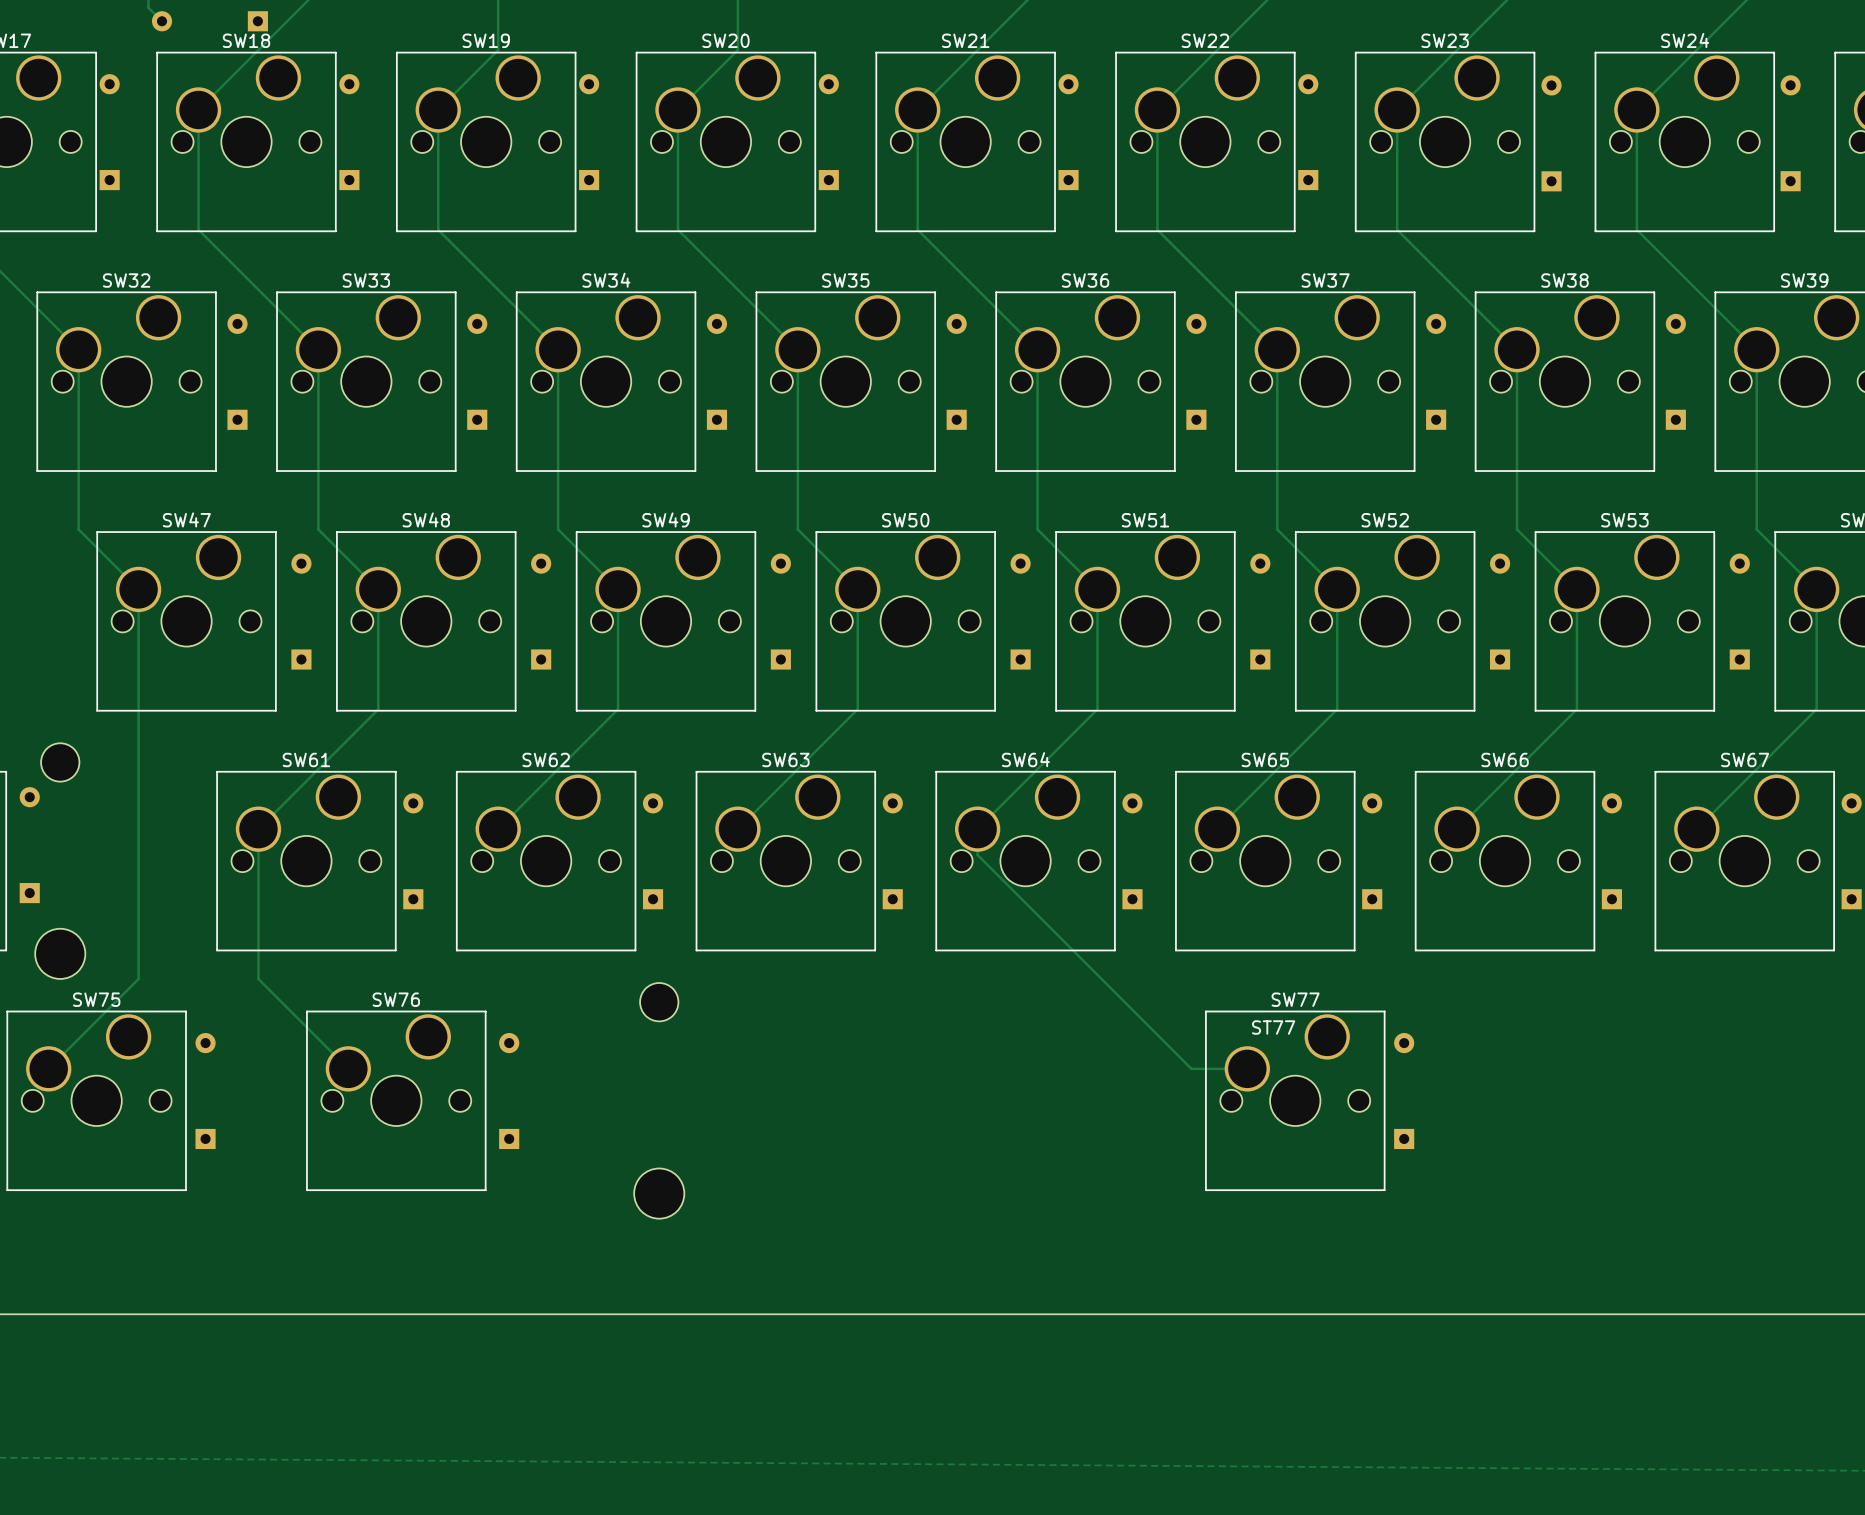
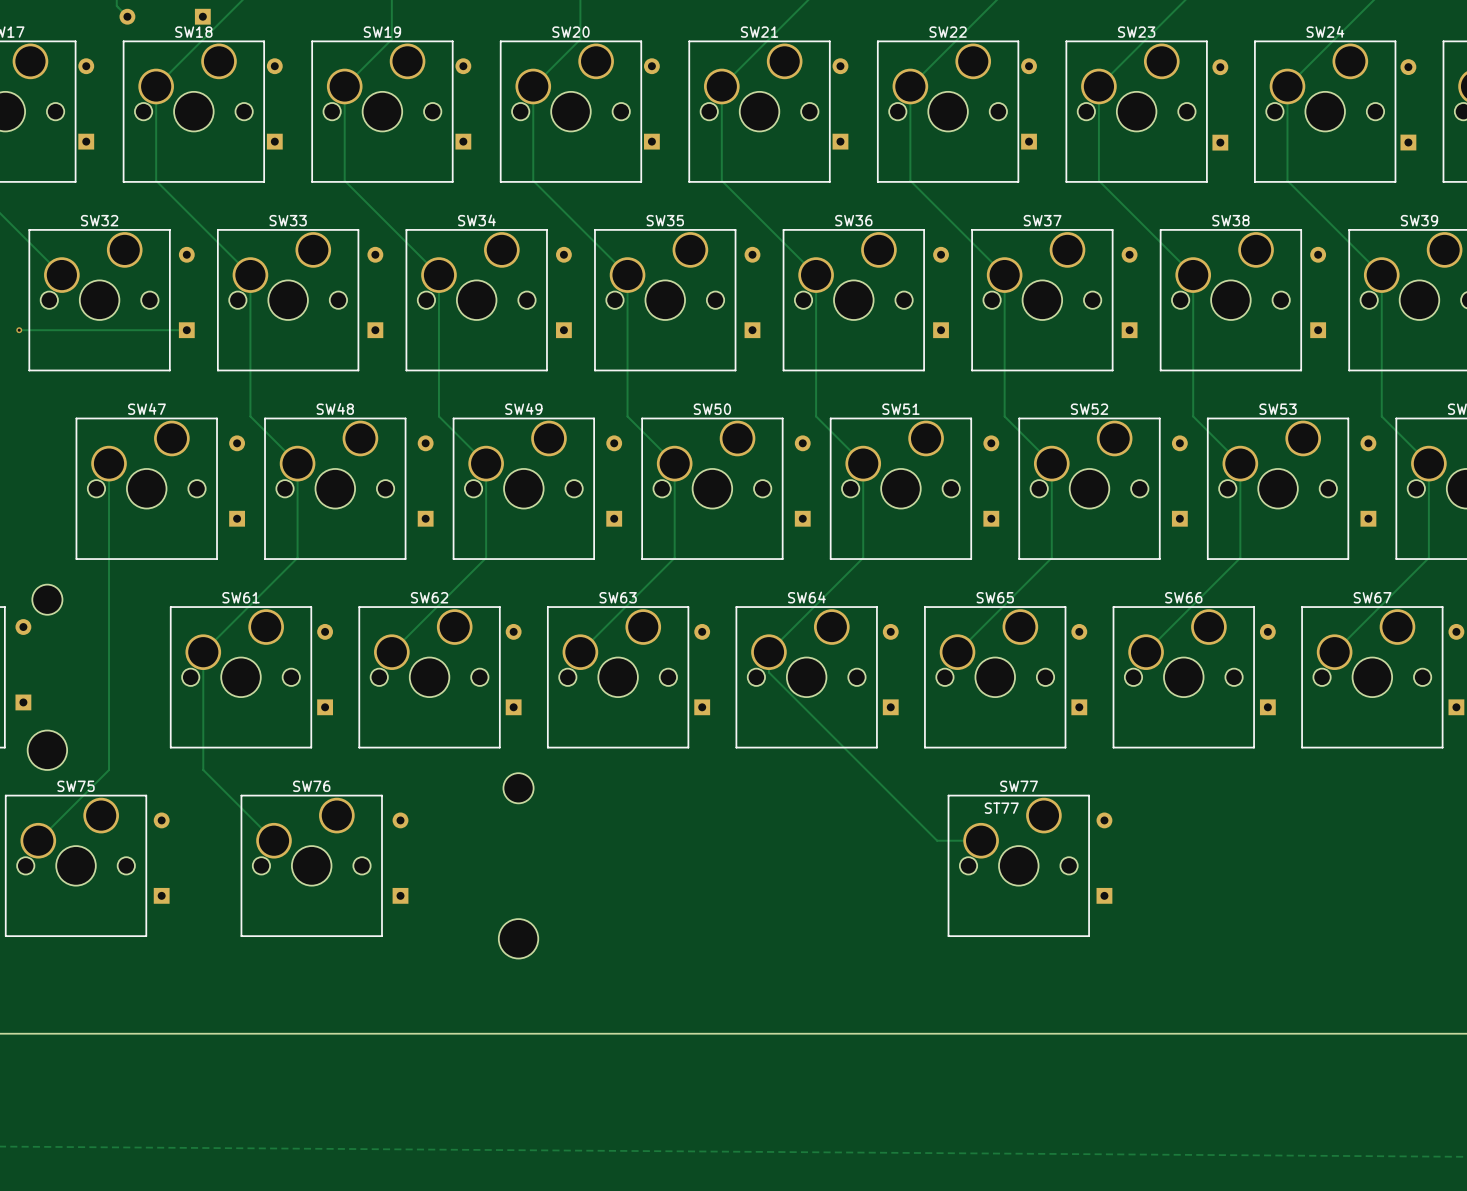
track: (78, 349) (78, 529) (138, 589) -> none
track: none -> (19, 330) (186, 330)
via: none -> (19, 330)

